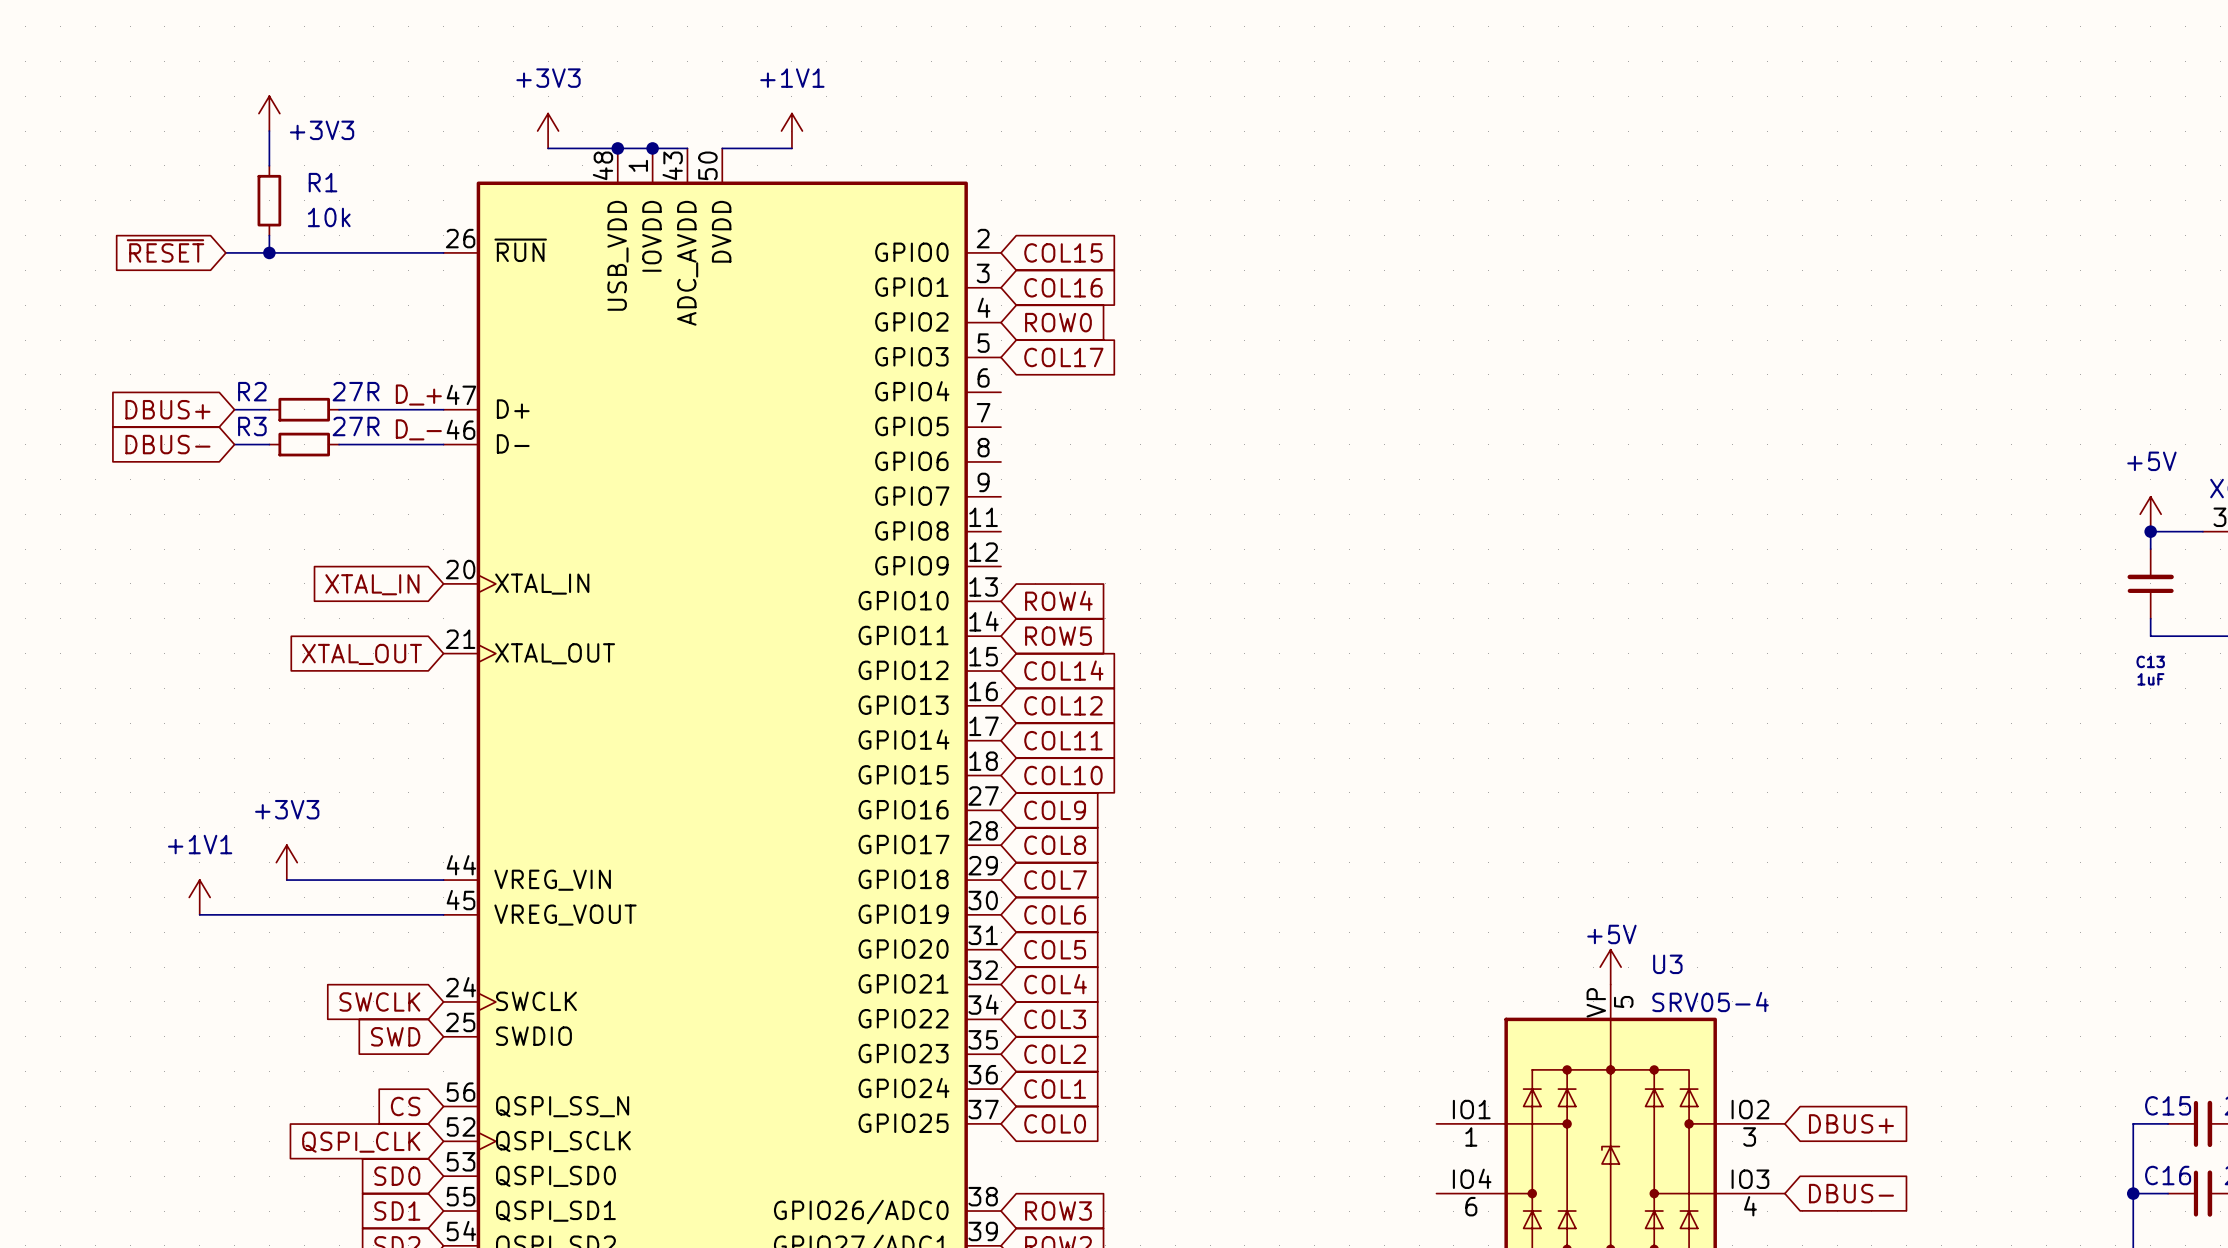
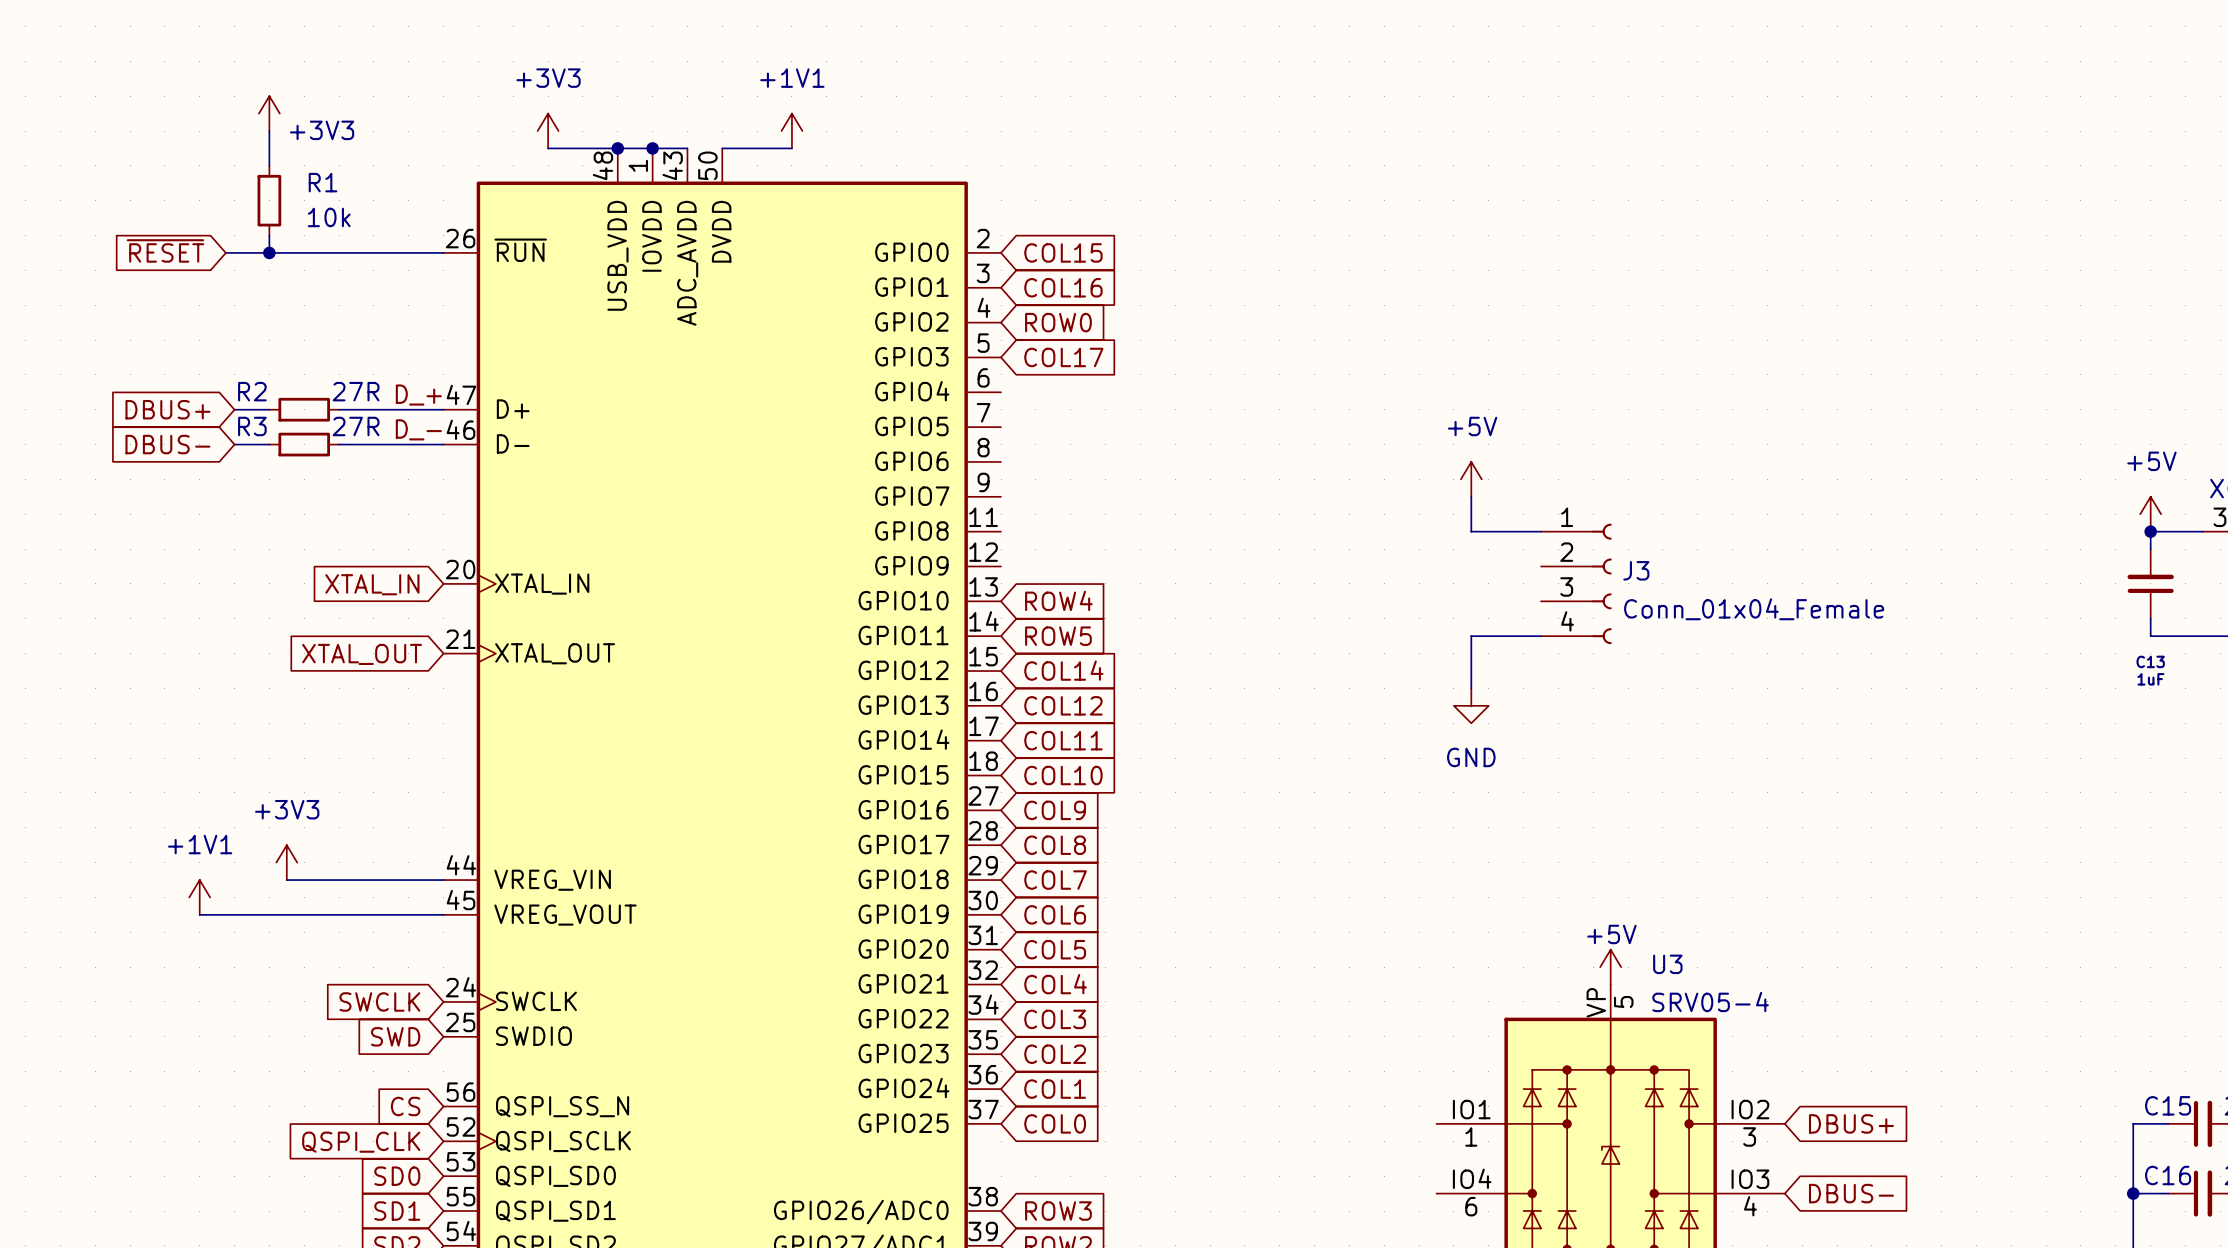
power symbol: none -> +5V (1471, 479)
wire: none -> (1471, 496) (1471, 531) (1541, 531)
J3: none -> Conn_01x04_Female (1576, 583)
wire: none -> (1541, 636) (1471, 636) (1471, 688)
power symbol: none -> GND (1471, 705)

